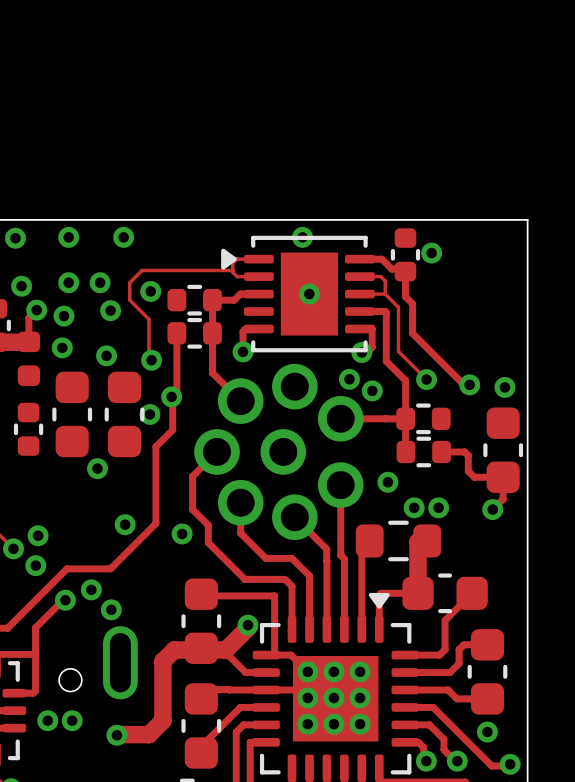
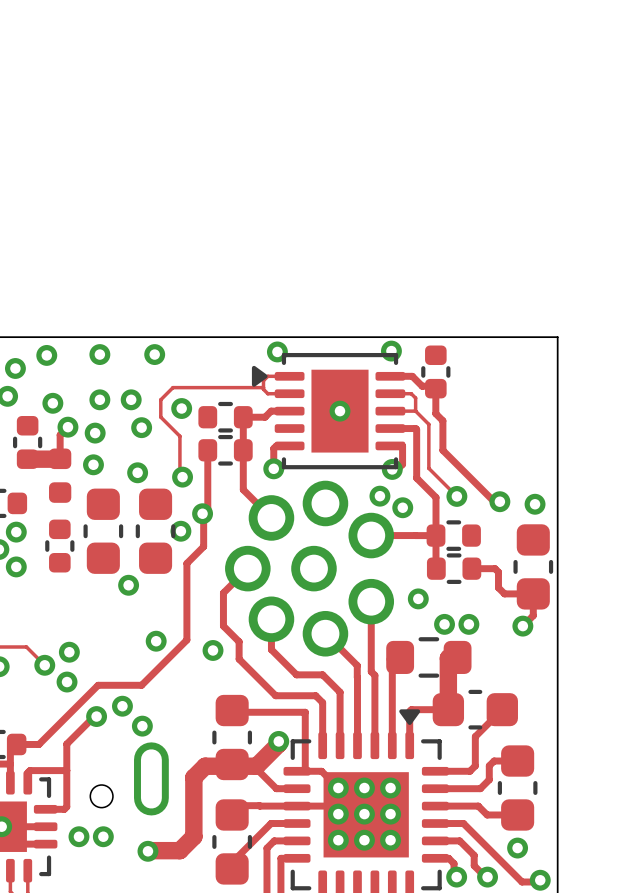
via: none -> (391, 351)
via: none -> (277, 351)
via: (302, 237) -> none
via: (431, 253) -> none

